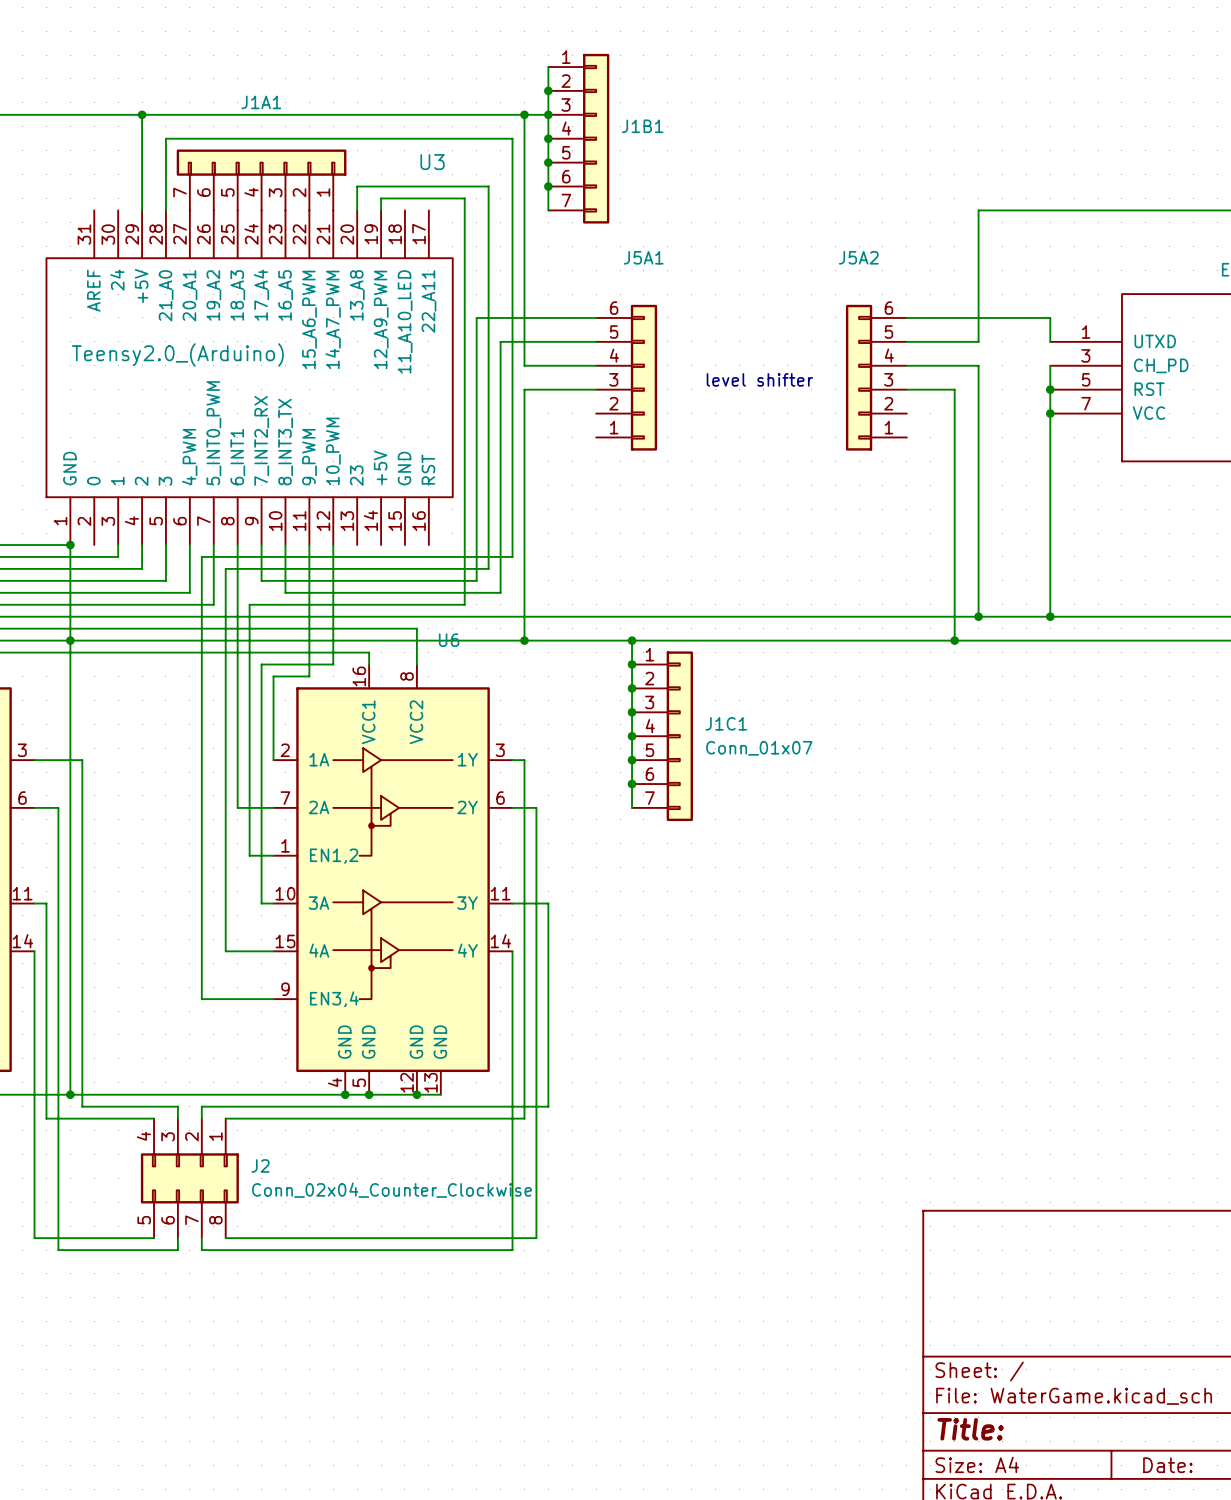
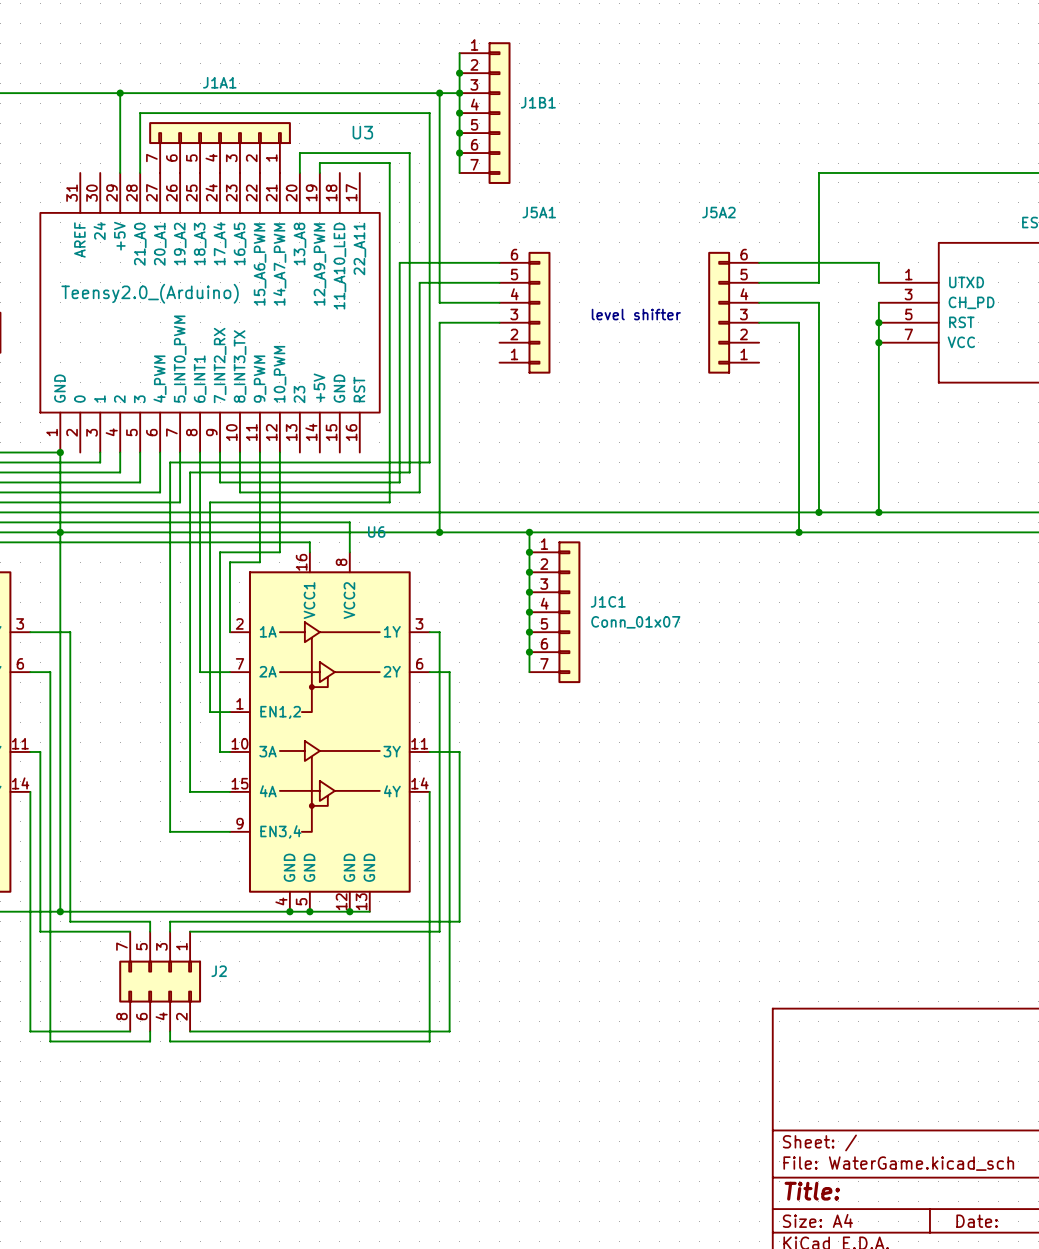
J2 pin number: 4 (143, 1136) -> 7 (121, 946)
J2 pin number: 3 (168, 1136) -> 5 (141, 946)
J2 pin number: 2 (191, 1136) -> 3 (161, 946)
J2 value: Conn_02x04_Counter_Clockwise (391, 1190) -> none
J2 pin number: 5 (144, 1220) -> 8 (121, 1016)
J2 pin number: 7 (191, 1220) -> 4 (161, 1016)
J2 pin number: 8 (215, 1220) -> 2 (181, 1016)

